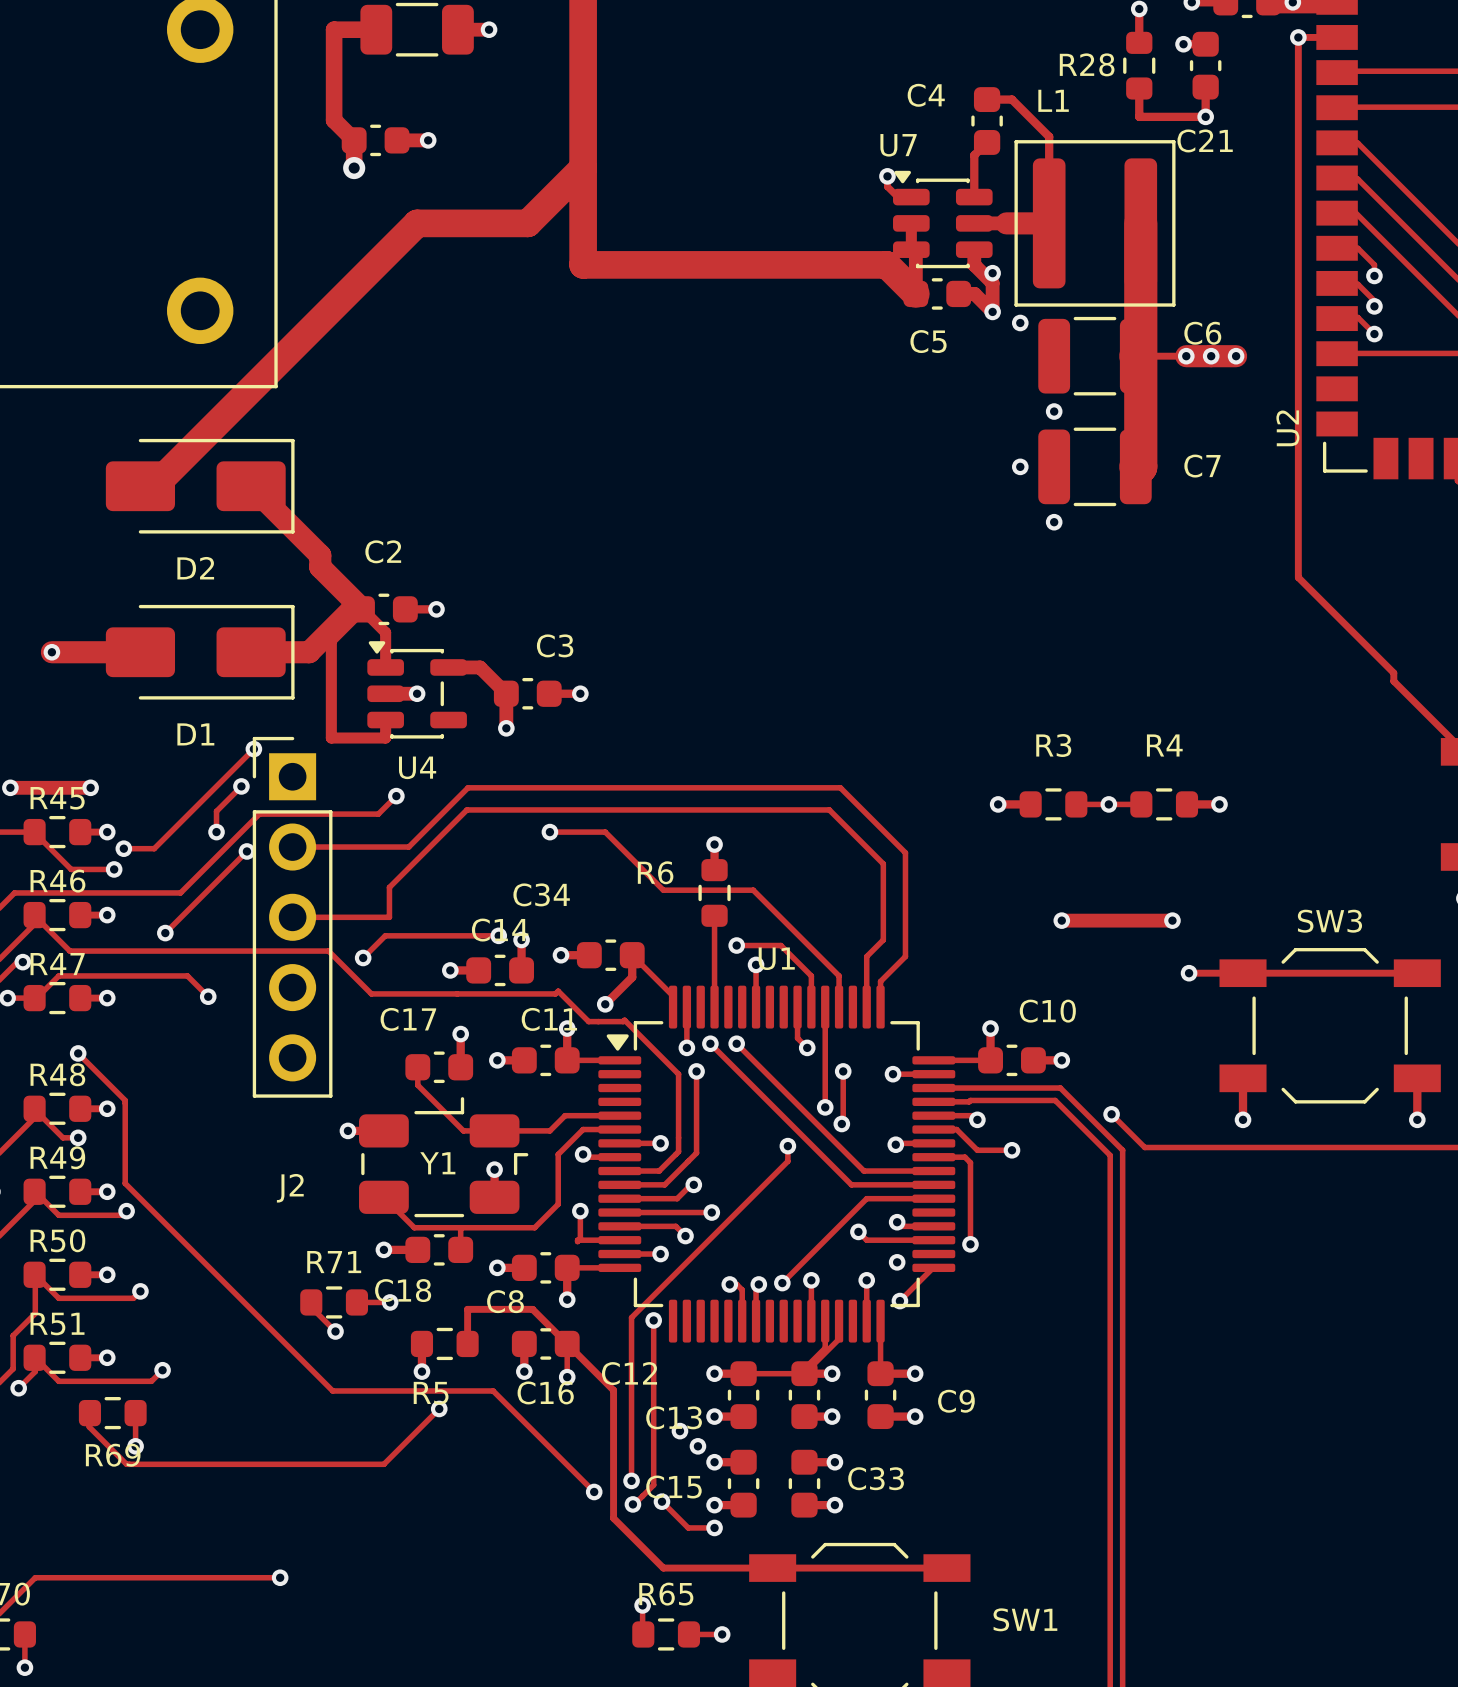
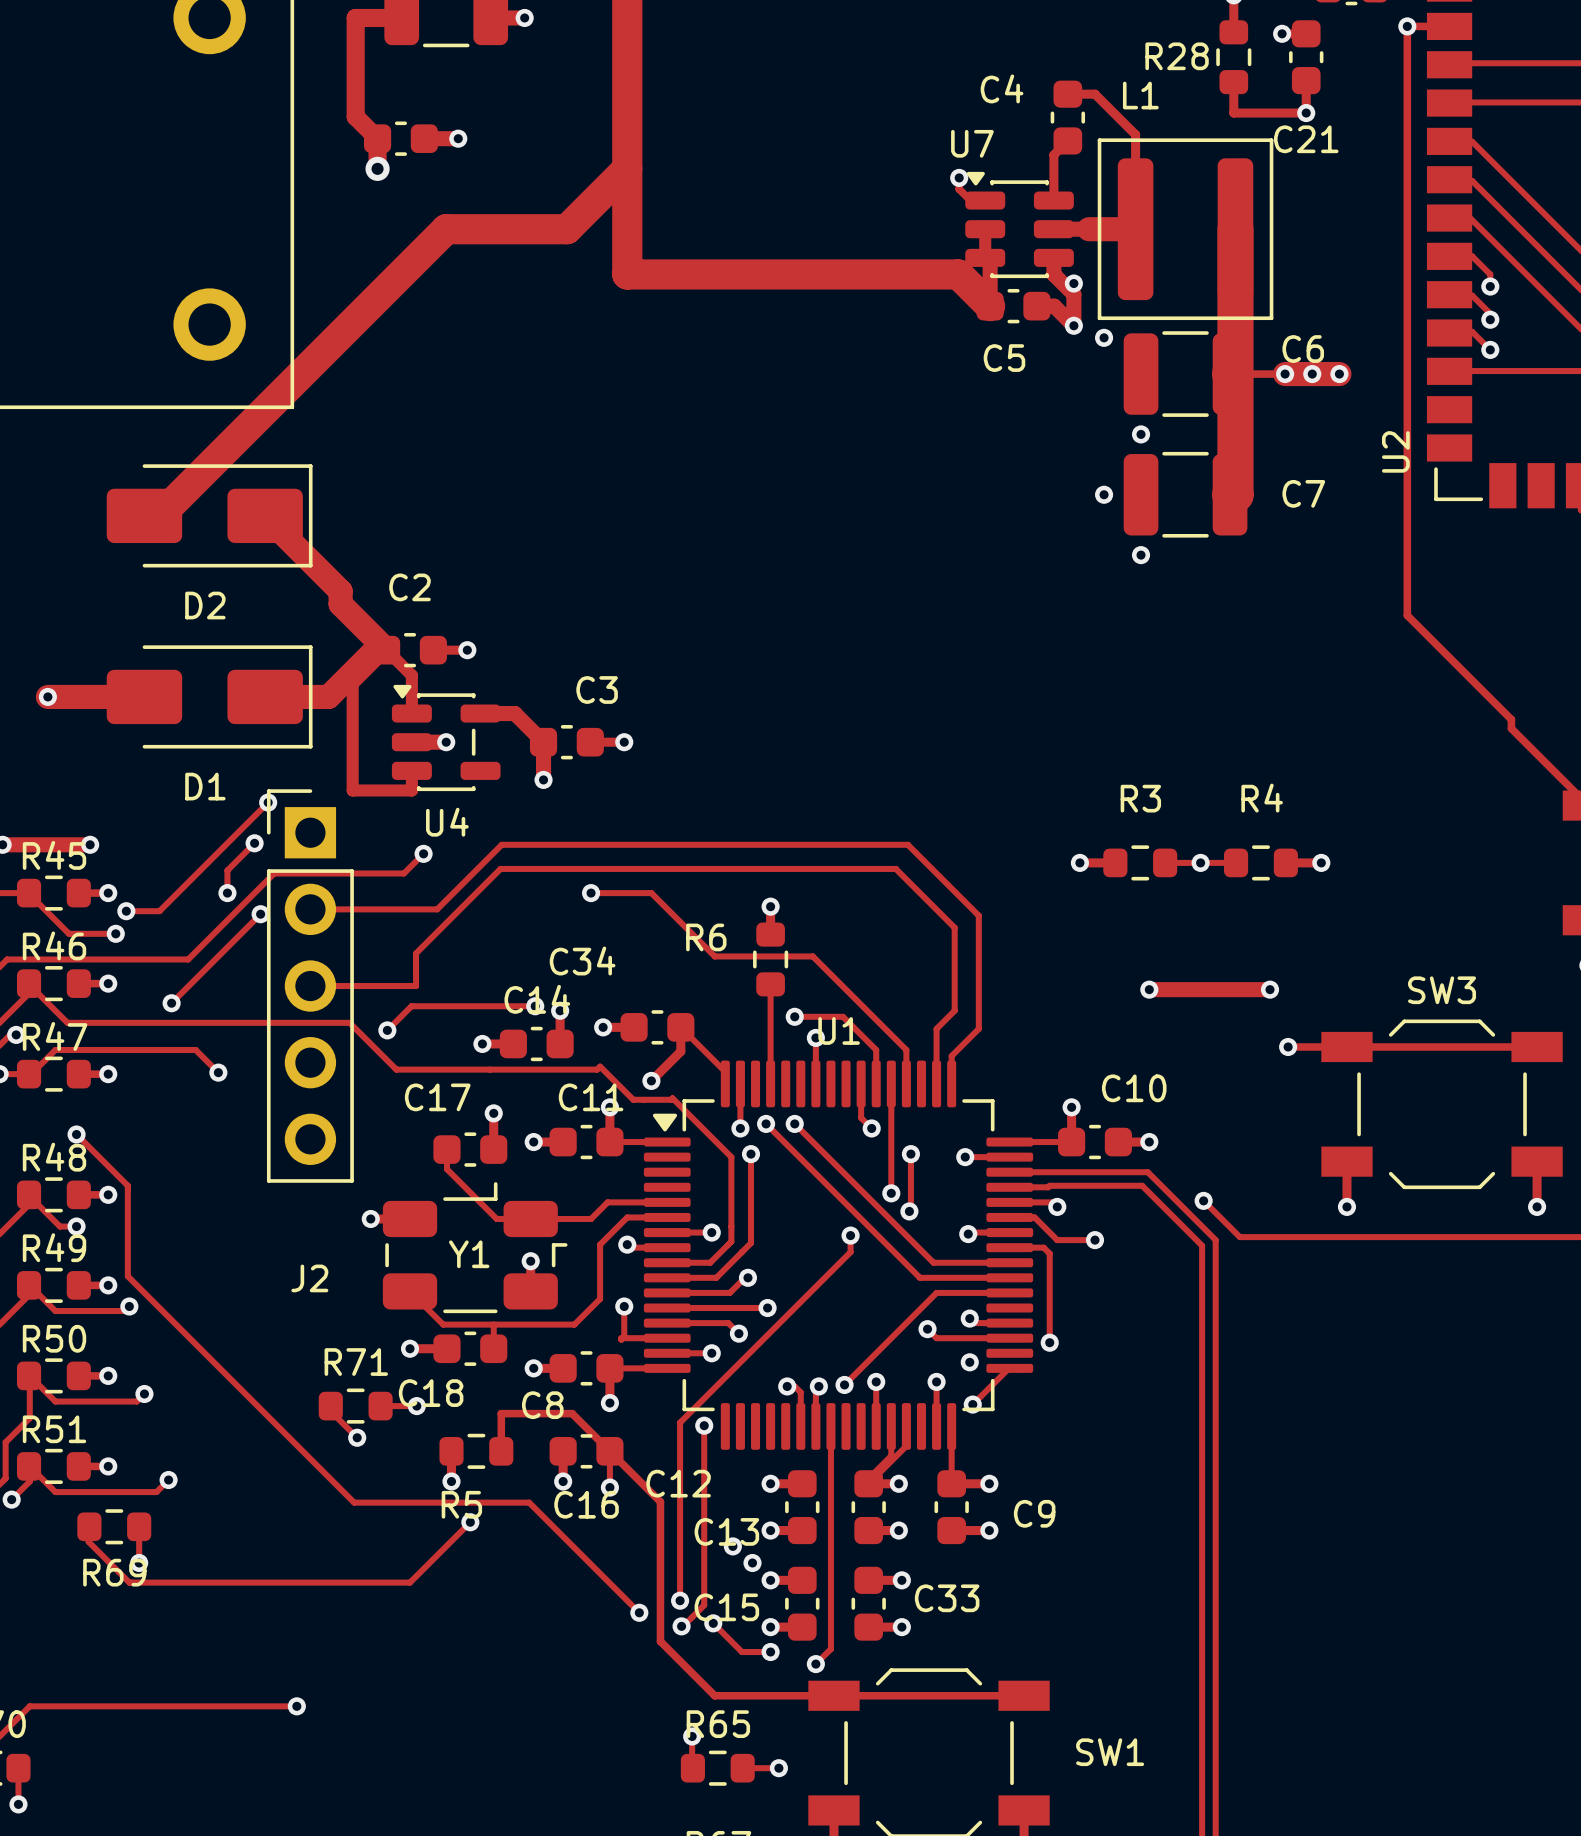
track: none -> (830, 1425) (830, 1648) (815, 1664)
track: (743, 1373) (799, 1373) -> none
via: none -> (815, 1664)

